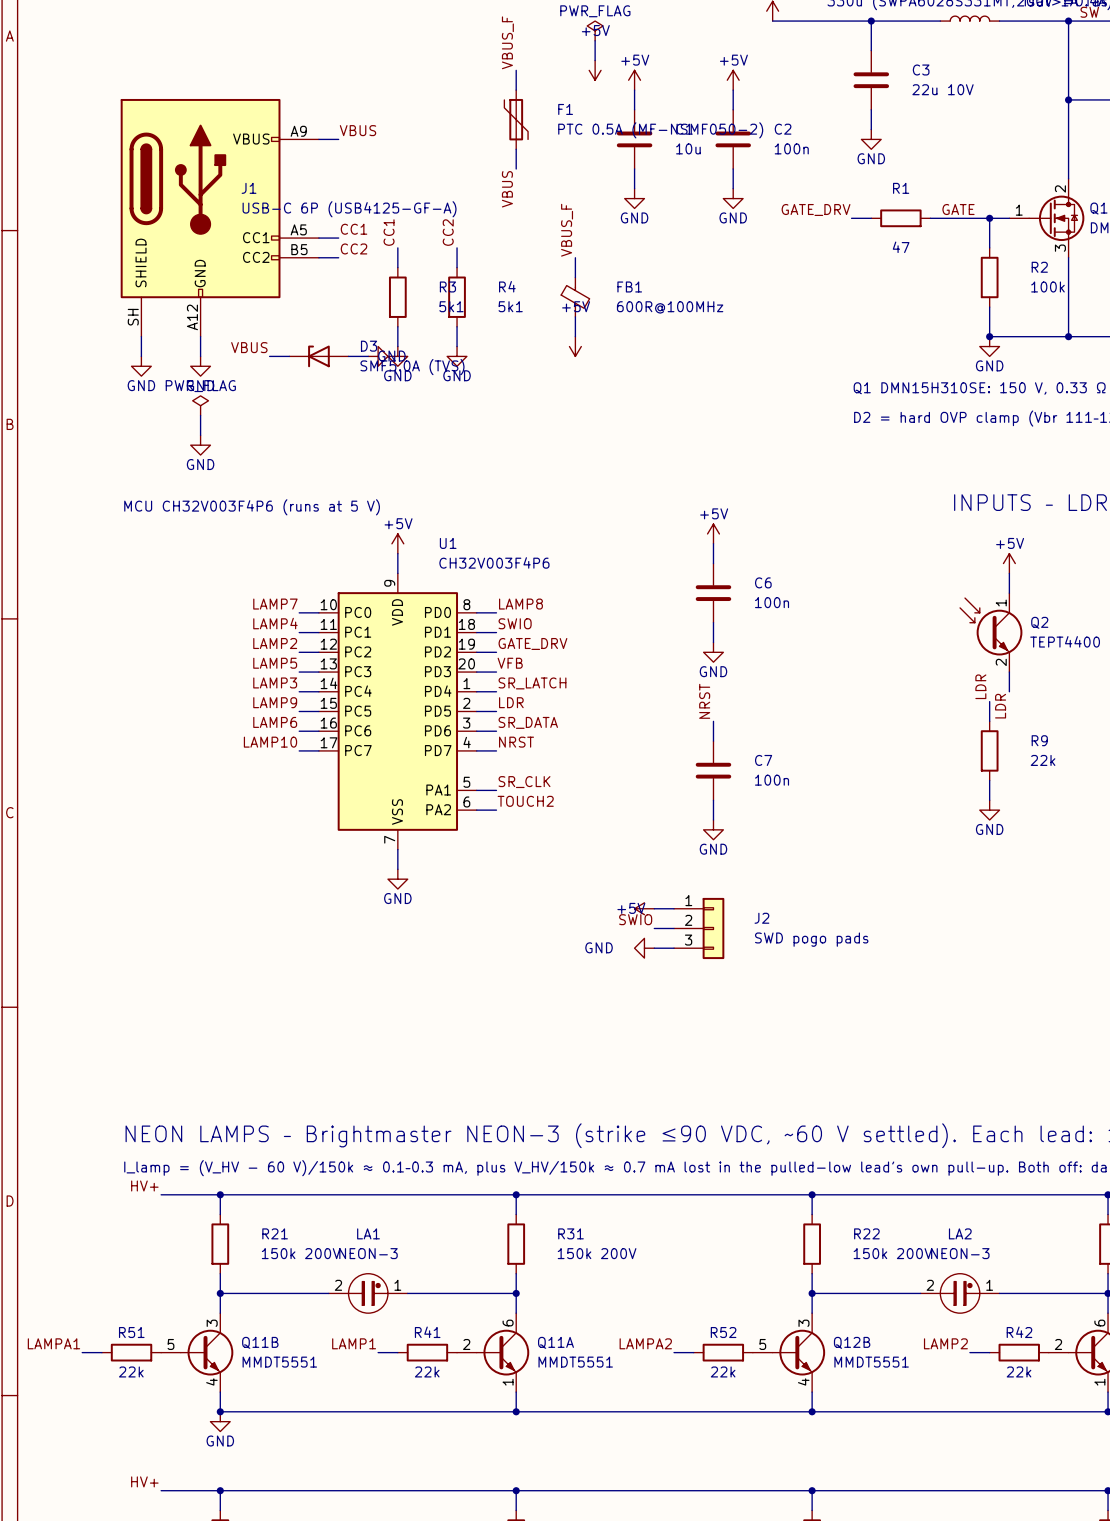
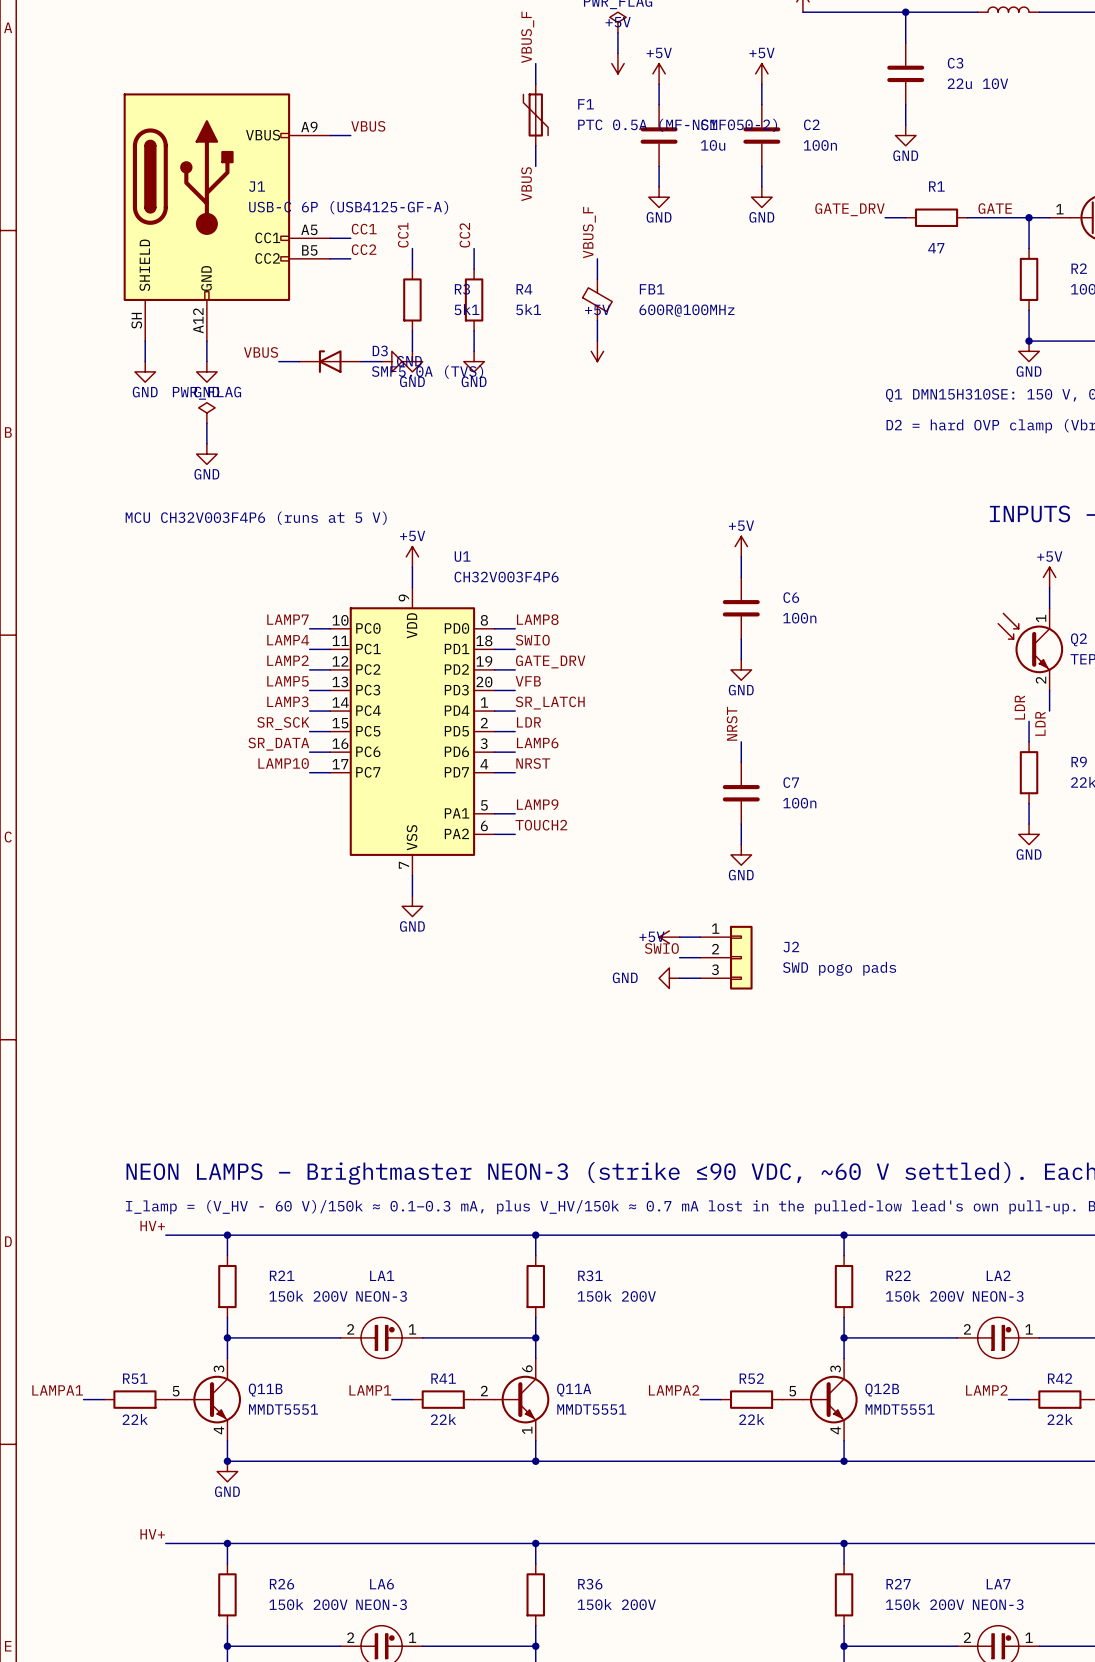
label: LAMP9 (275, 702) -> SR_SCK (283, 723)
label: LAMP6 (275, 722) -> SR_DATA (278, 744)
label: SR_DATA (528, 722) -> LAMP6 (537, 743)
label: SR_CLK (524, 782) -> LAMP9 (537, 804)

